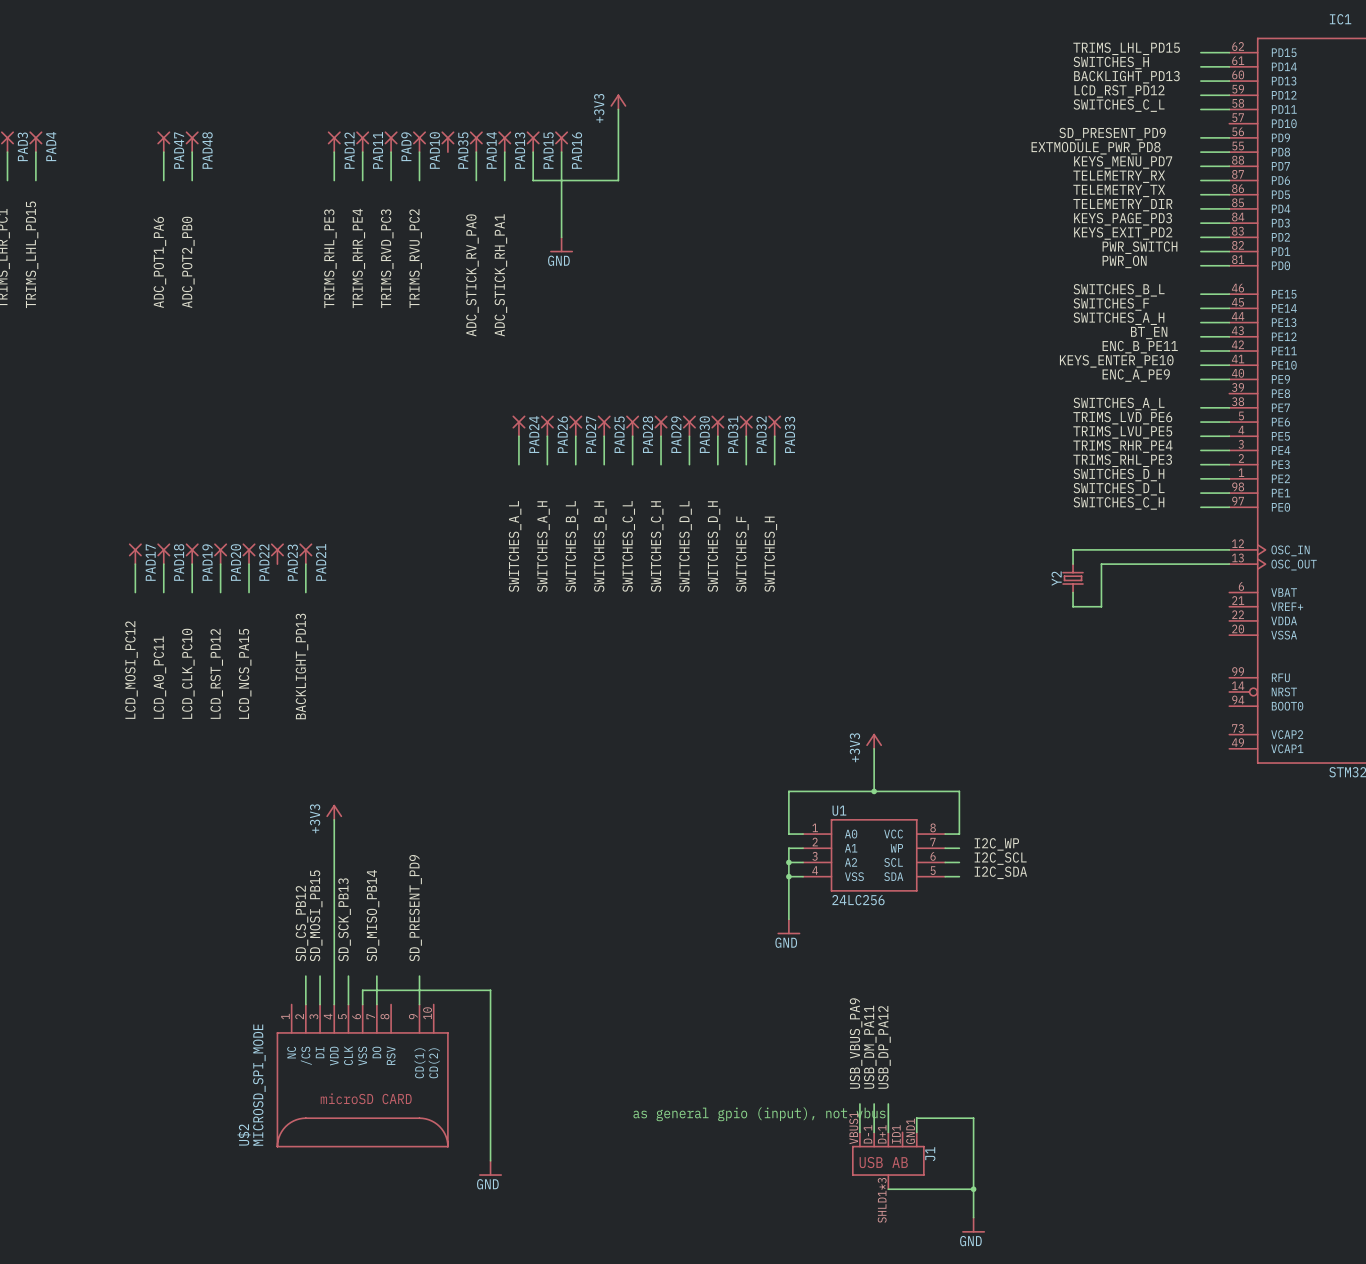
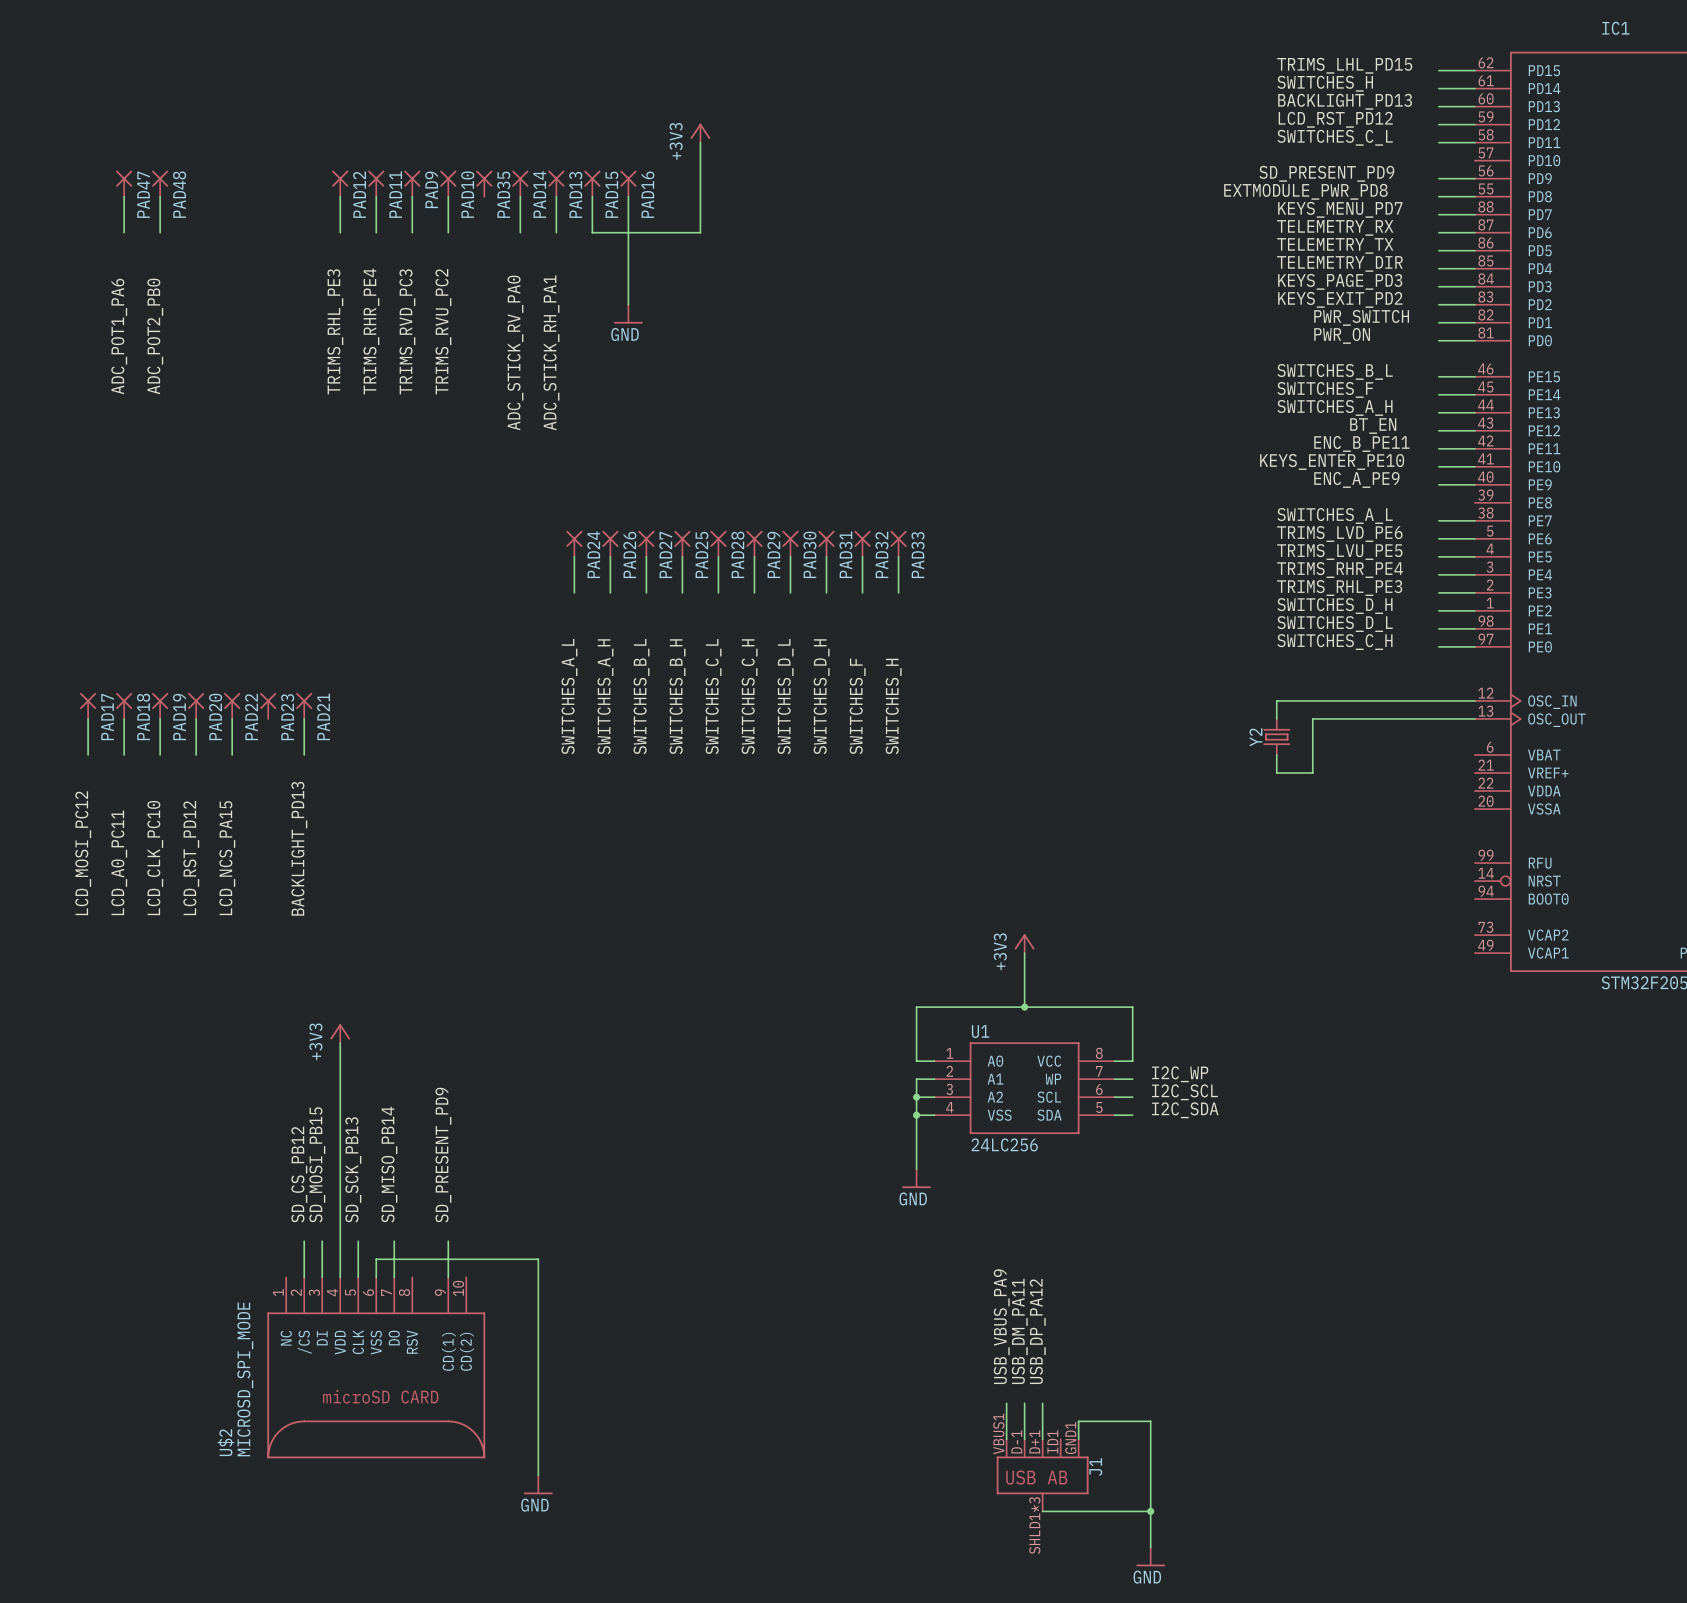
text: as general gpio (input), not vbus (759, 1114) -> none

